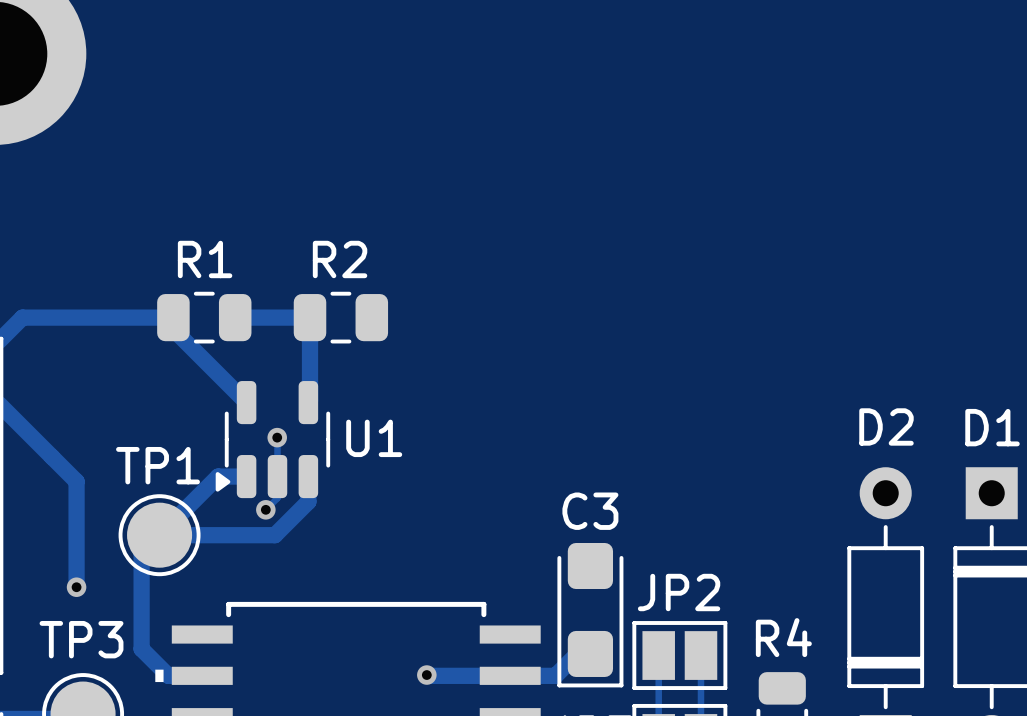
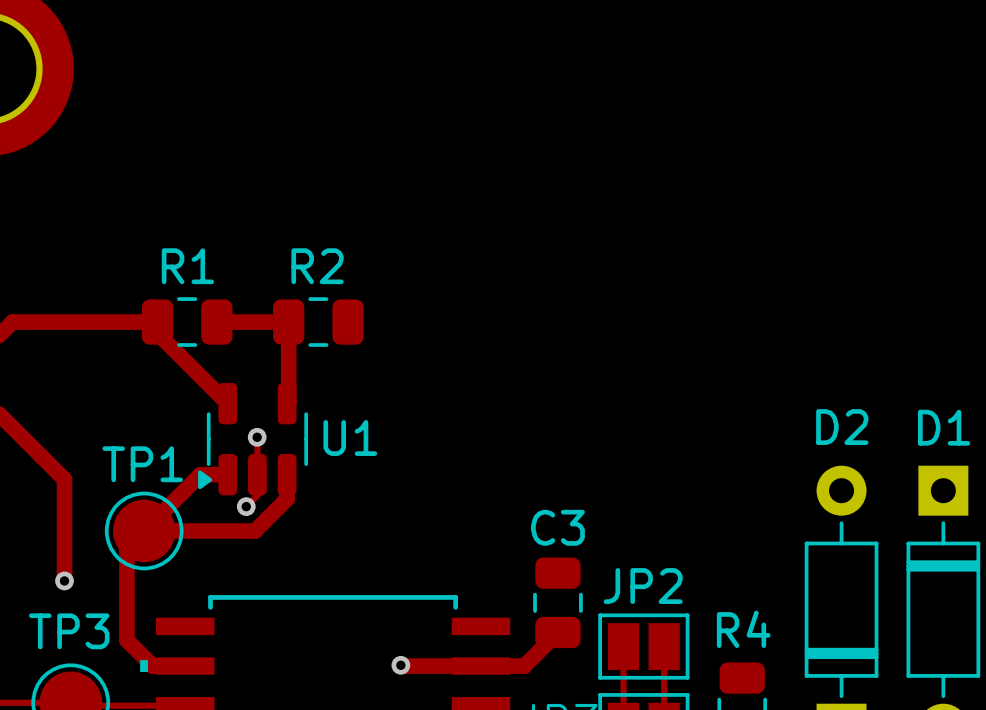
C3 footprint: [557, 542, 624, 688] -> [533, 557, 583, 649]

